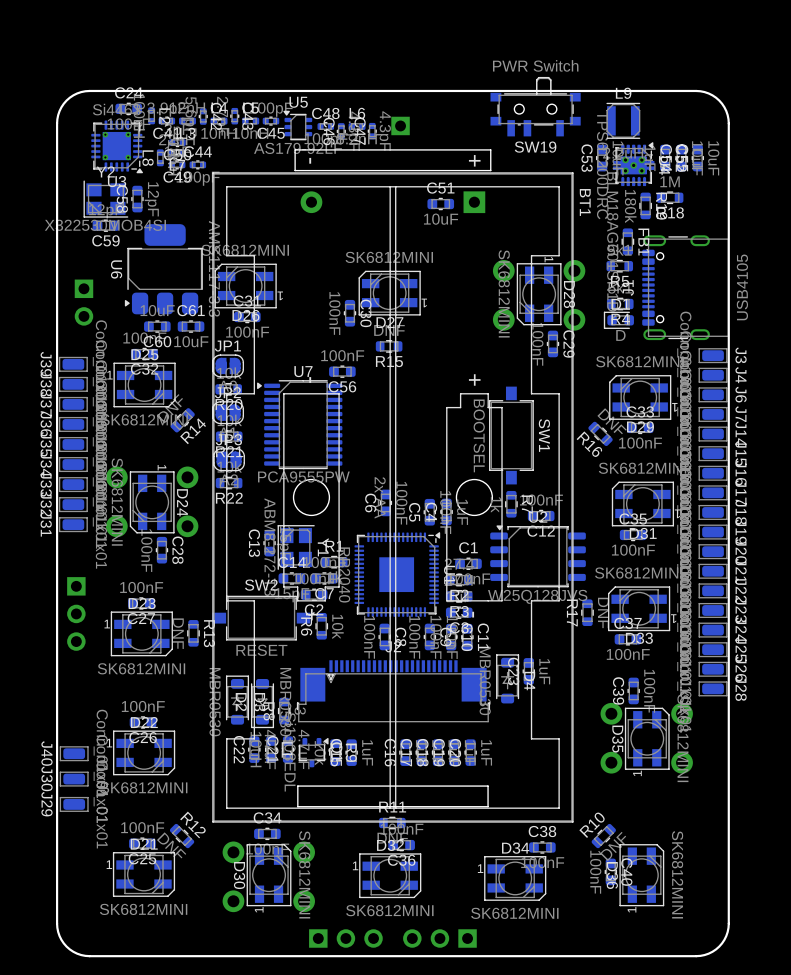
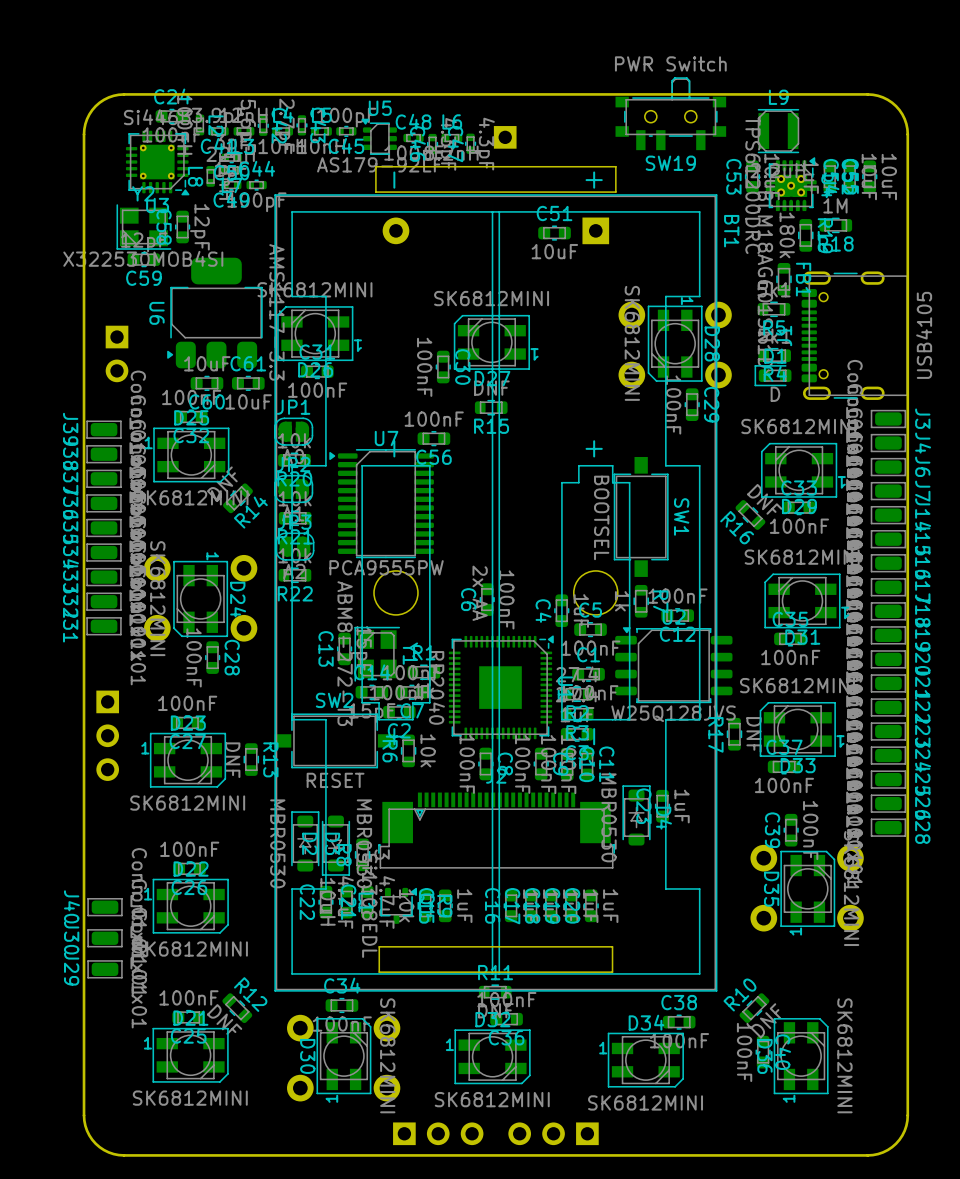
C5 rotation: 0° (429, 512) -> 90° clockwise (590, 629)
C5 position: (429, 512) -> (590, 629)

